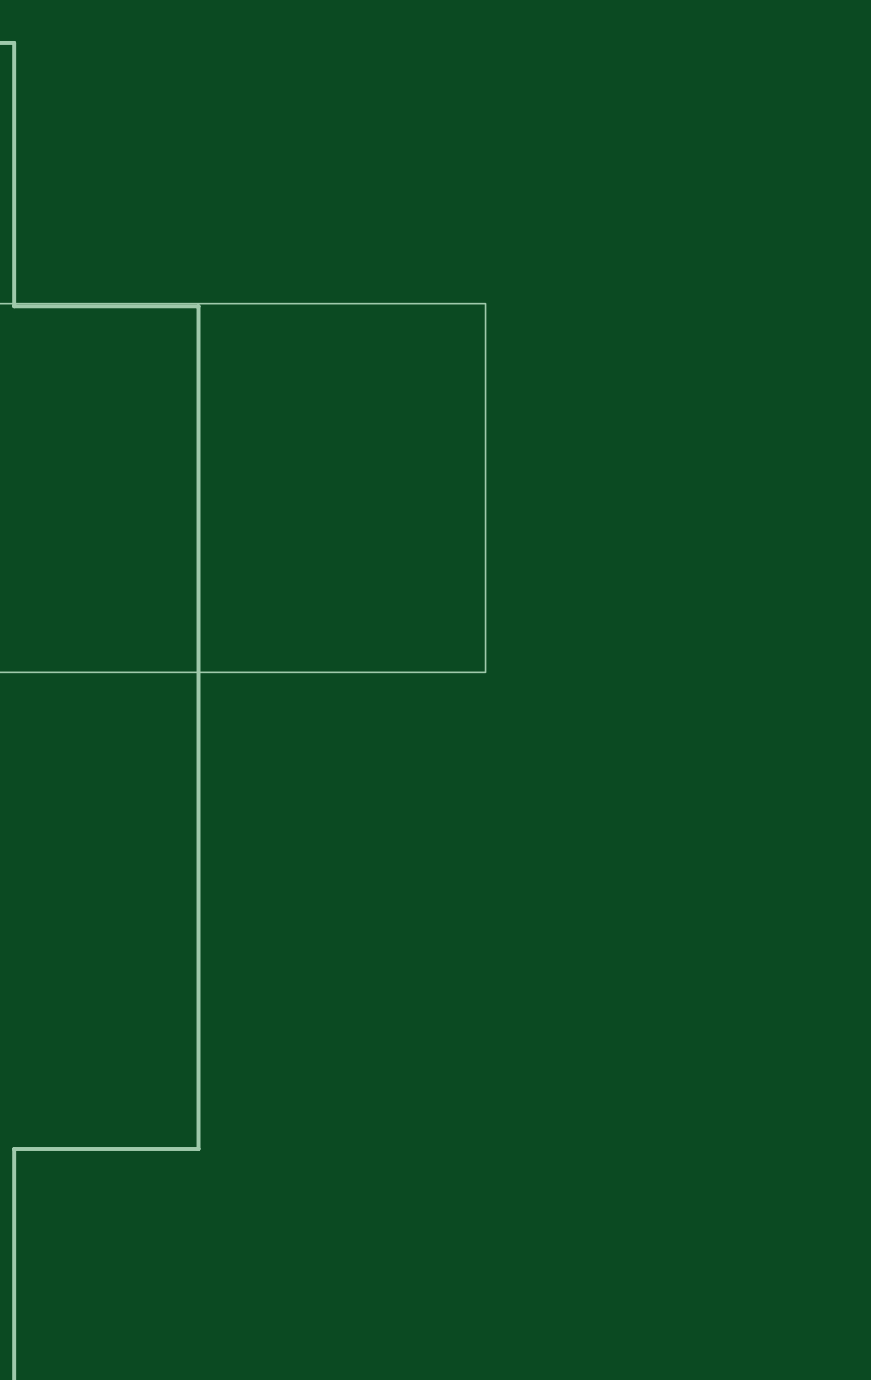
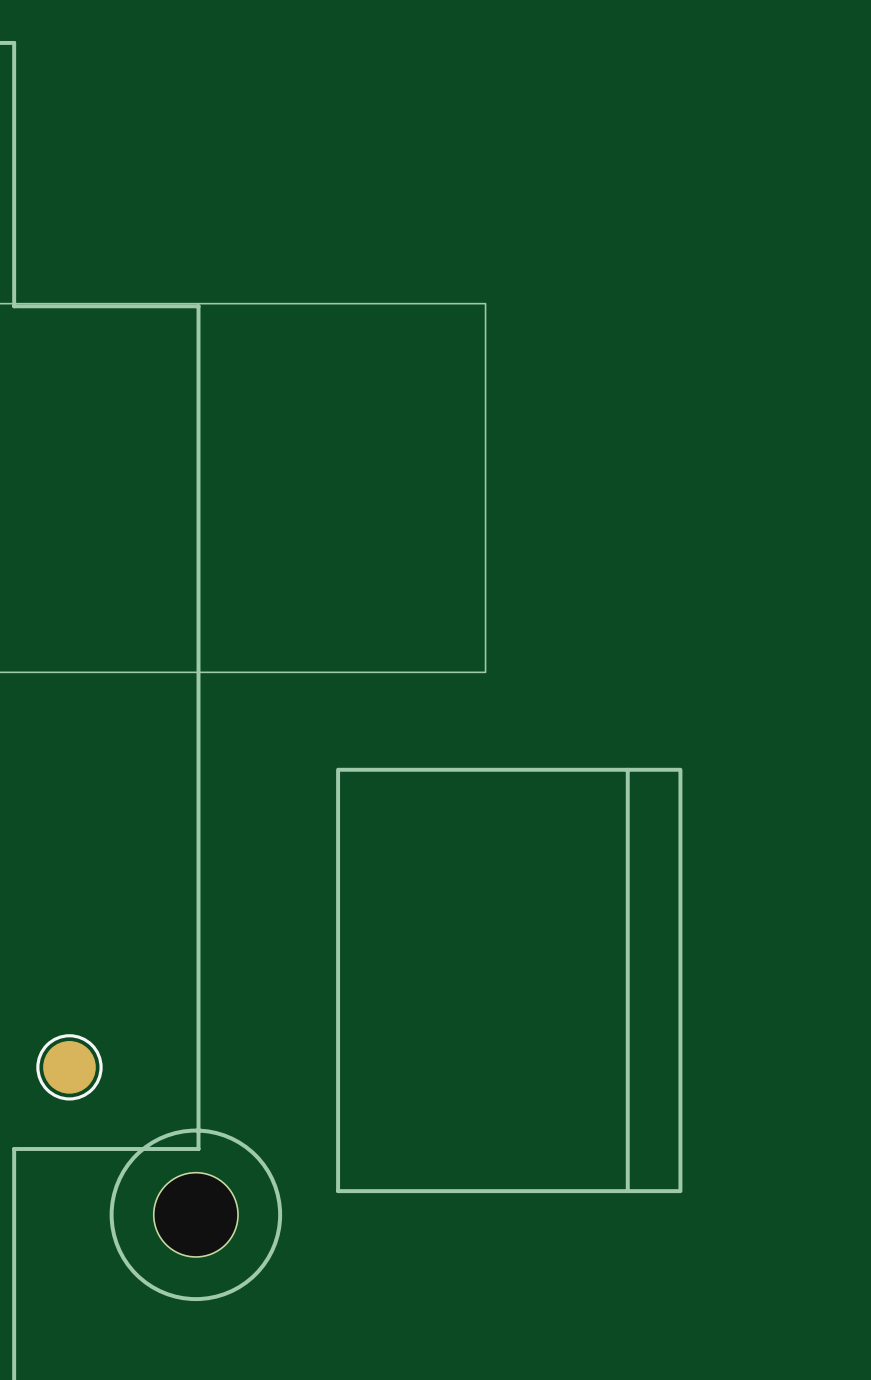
drawing: none -> [336, 767, 683, 1194]
part: none -> (69, 1067)
part: none -> (195, 1214)

